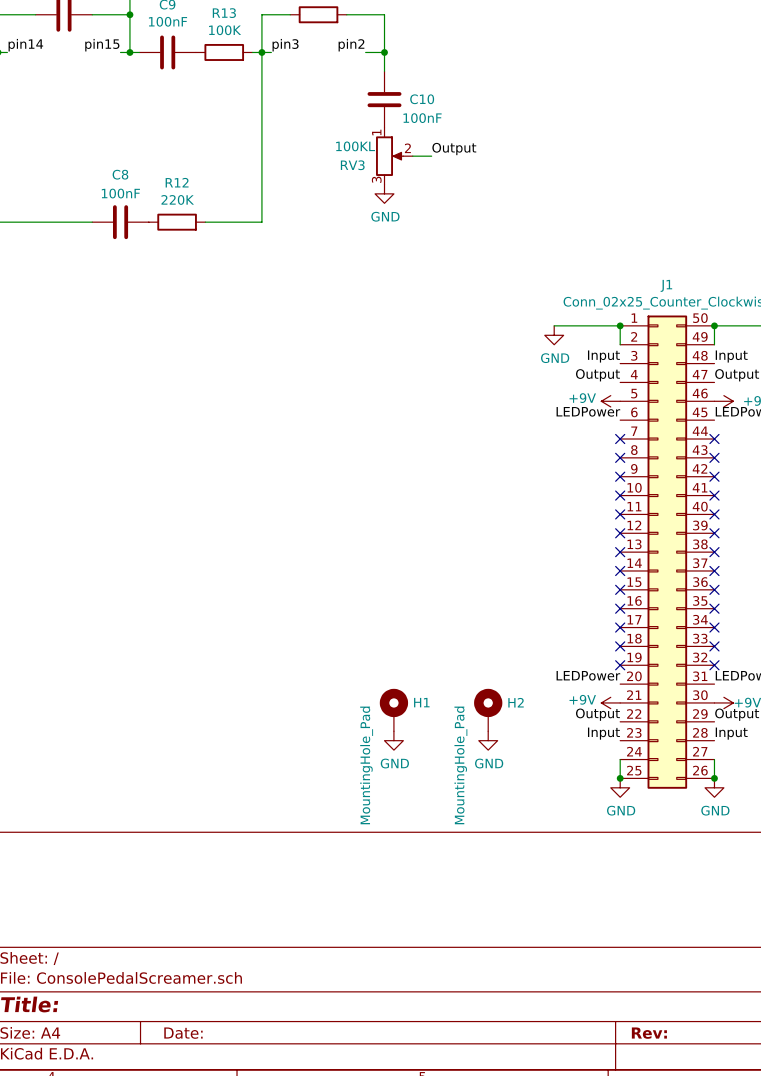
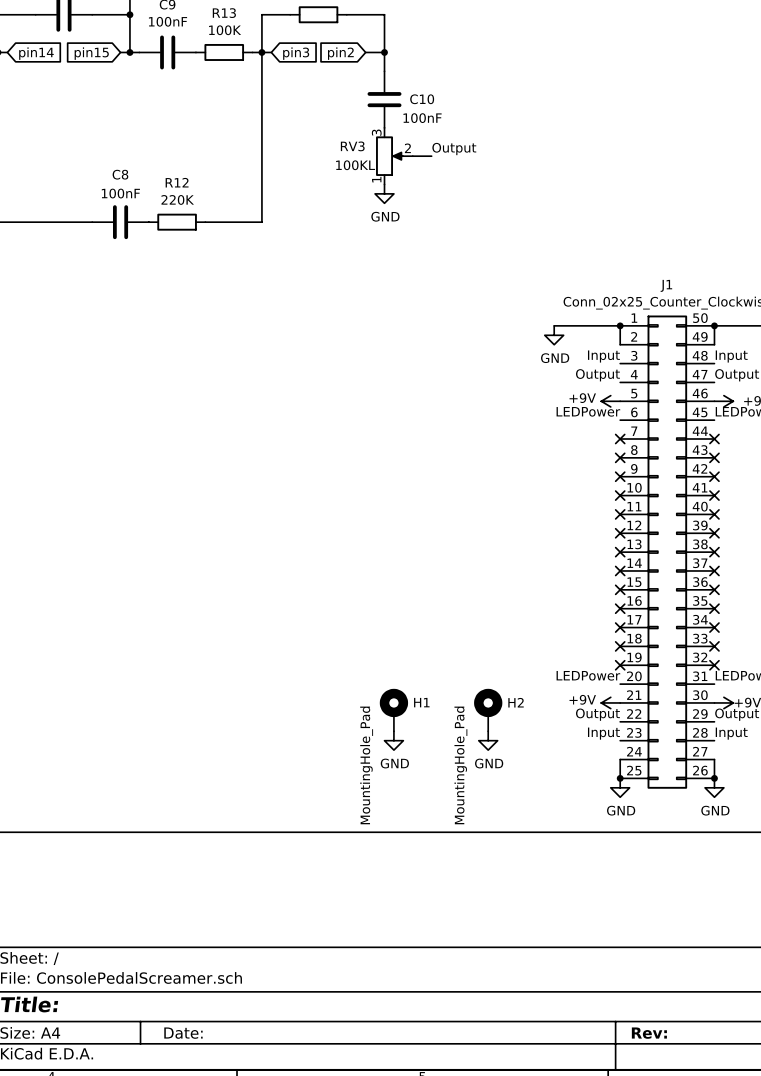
label: pin14 (25, 45) -> none
label: pin15 (102, 45) -> none
label: pin3 (285, 45) -> none
label: pin2 (351, 45) -> none
global label: none -> pin14 (36, 53)
global label: none -> pin15 (91, 53)
global label: none -> pin3 (296, 53)
global label: none -> pin2 (340, 53)
RV3 flip: as is (389, 156) -> up-down (389, 156)

